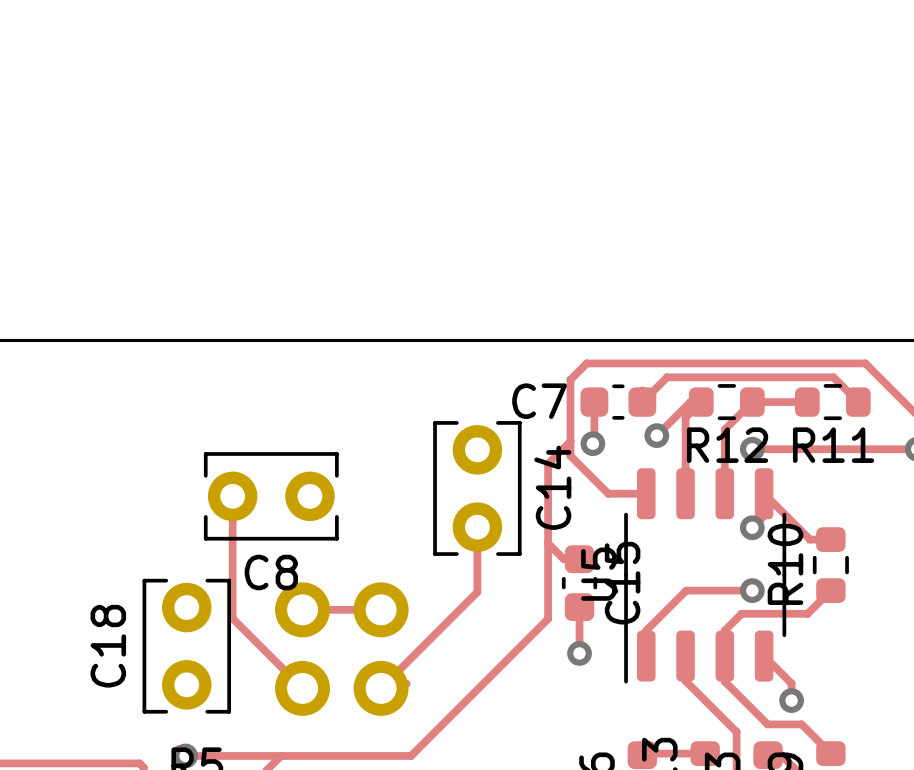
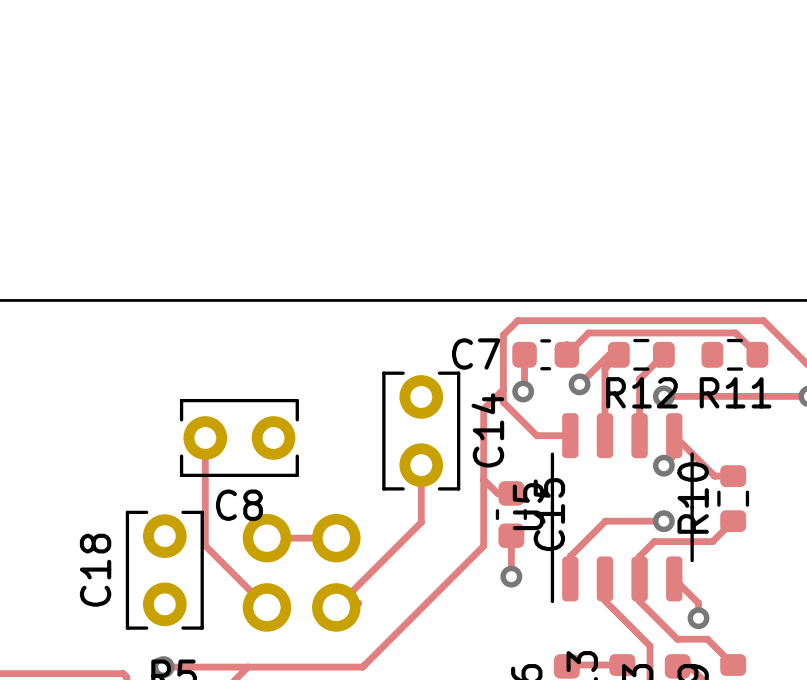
track: (752, 402) (807, 402) -> none

